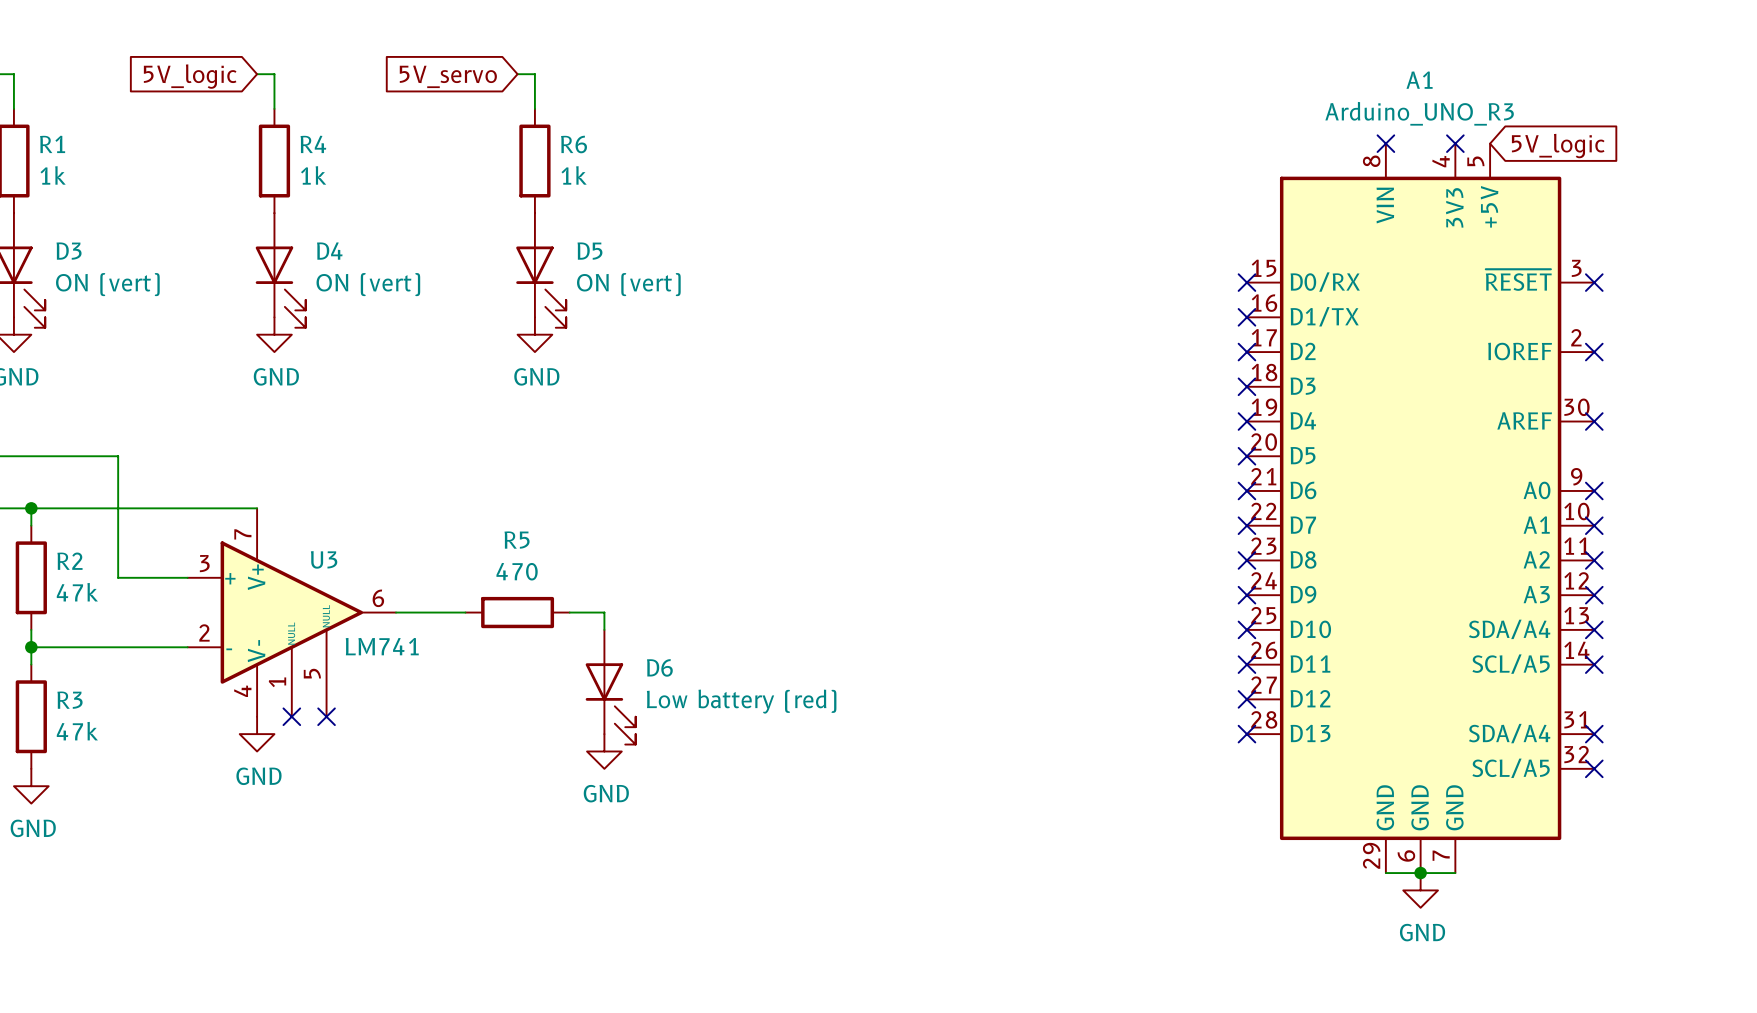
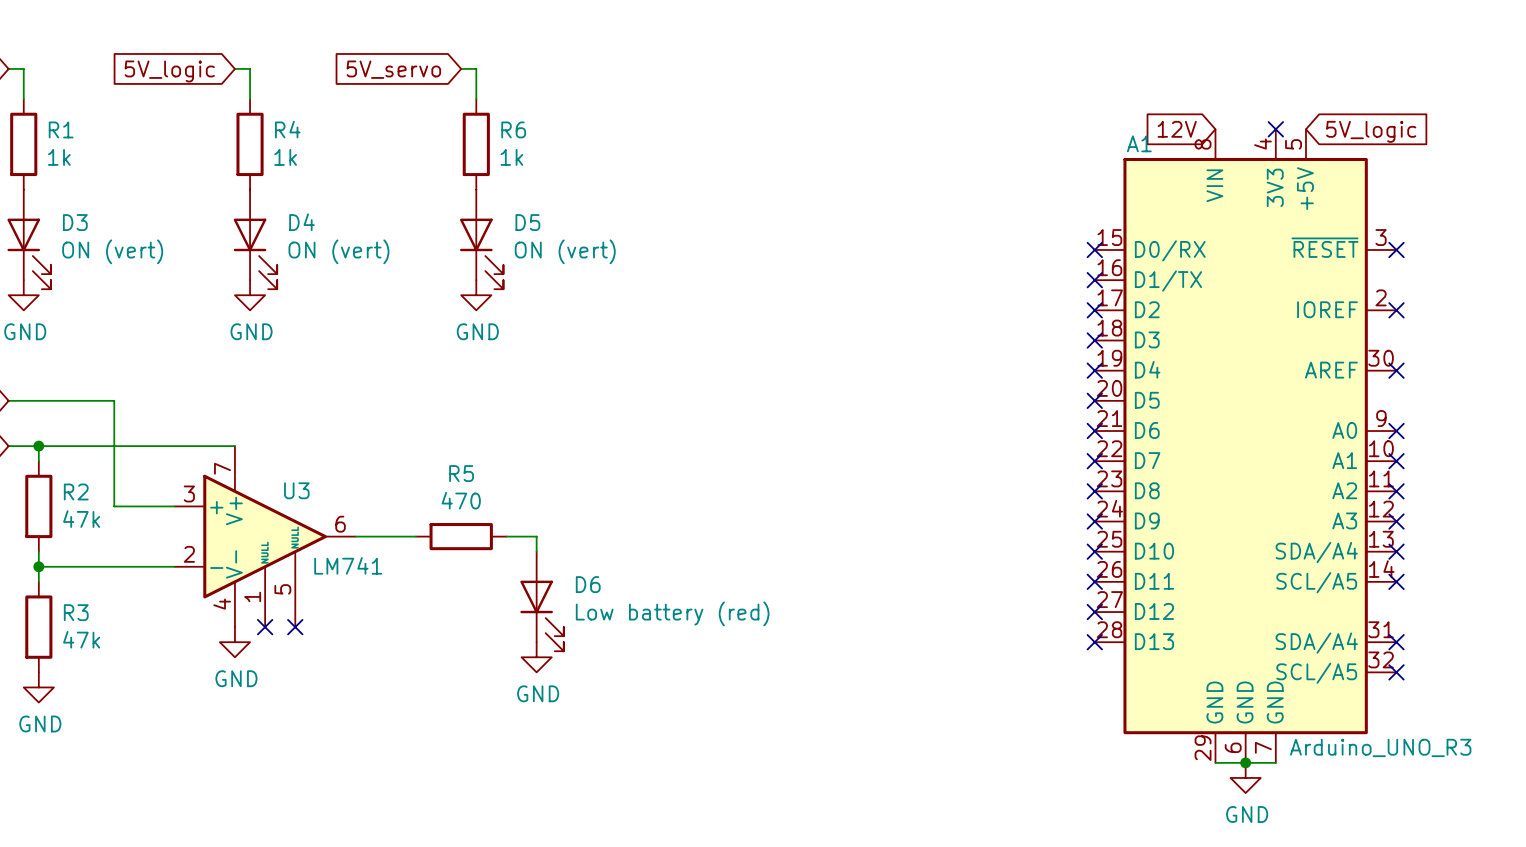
A1 name position: A1 (1419, 80) -> A1 (1139, 143)
A1 value position: Arduino_UNO_R3 (1419, 113) -> Arduino_UNO_R3 (1380, 747)
global label: none -> 12V (1177, 129)
no-connect mark: (1385, 143) -> none

